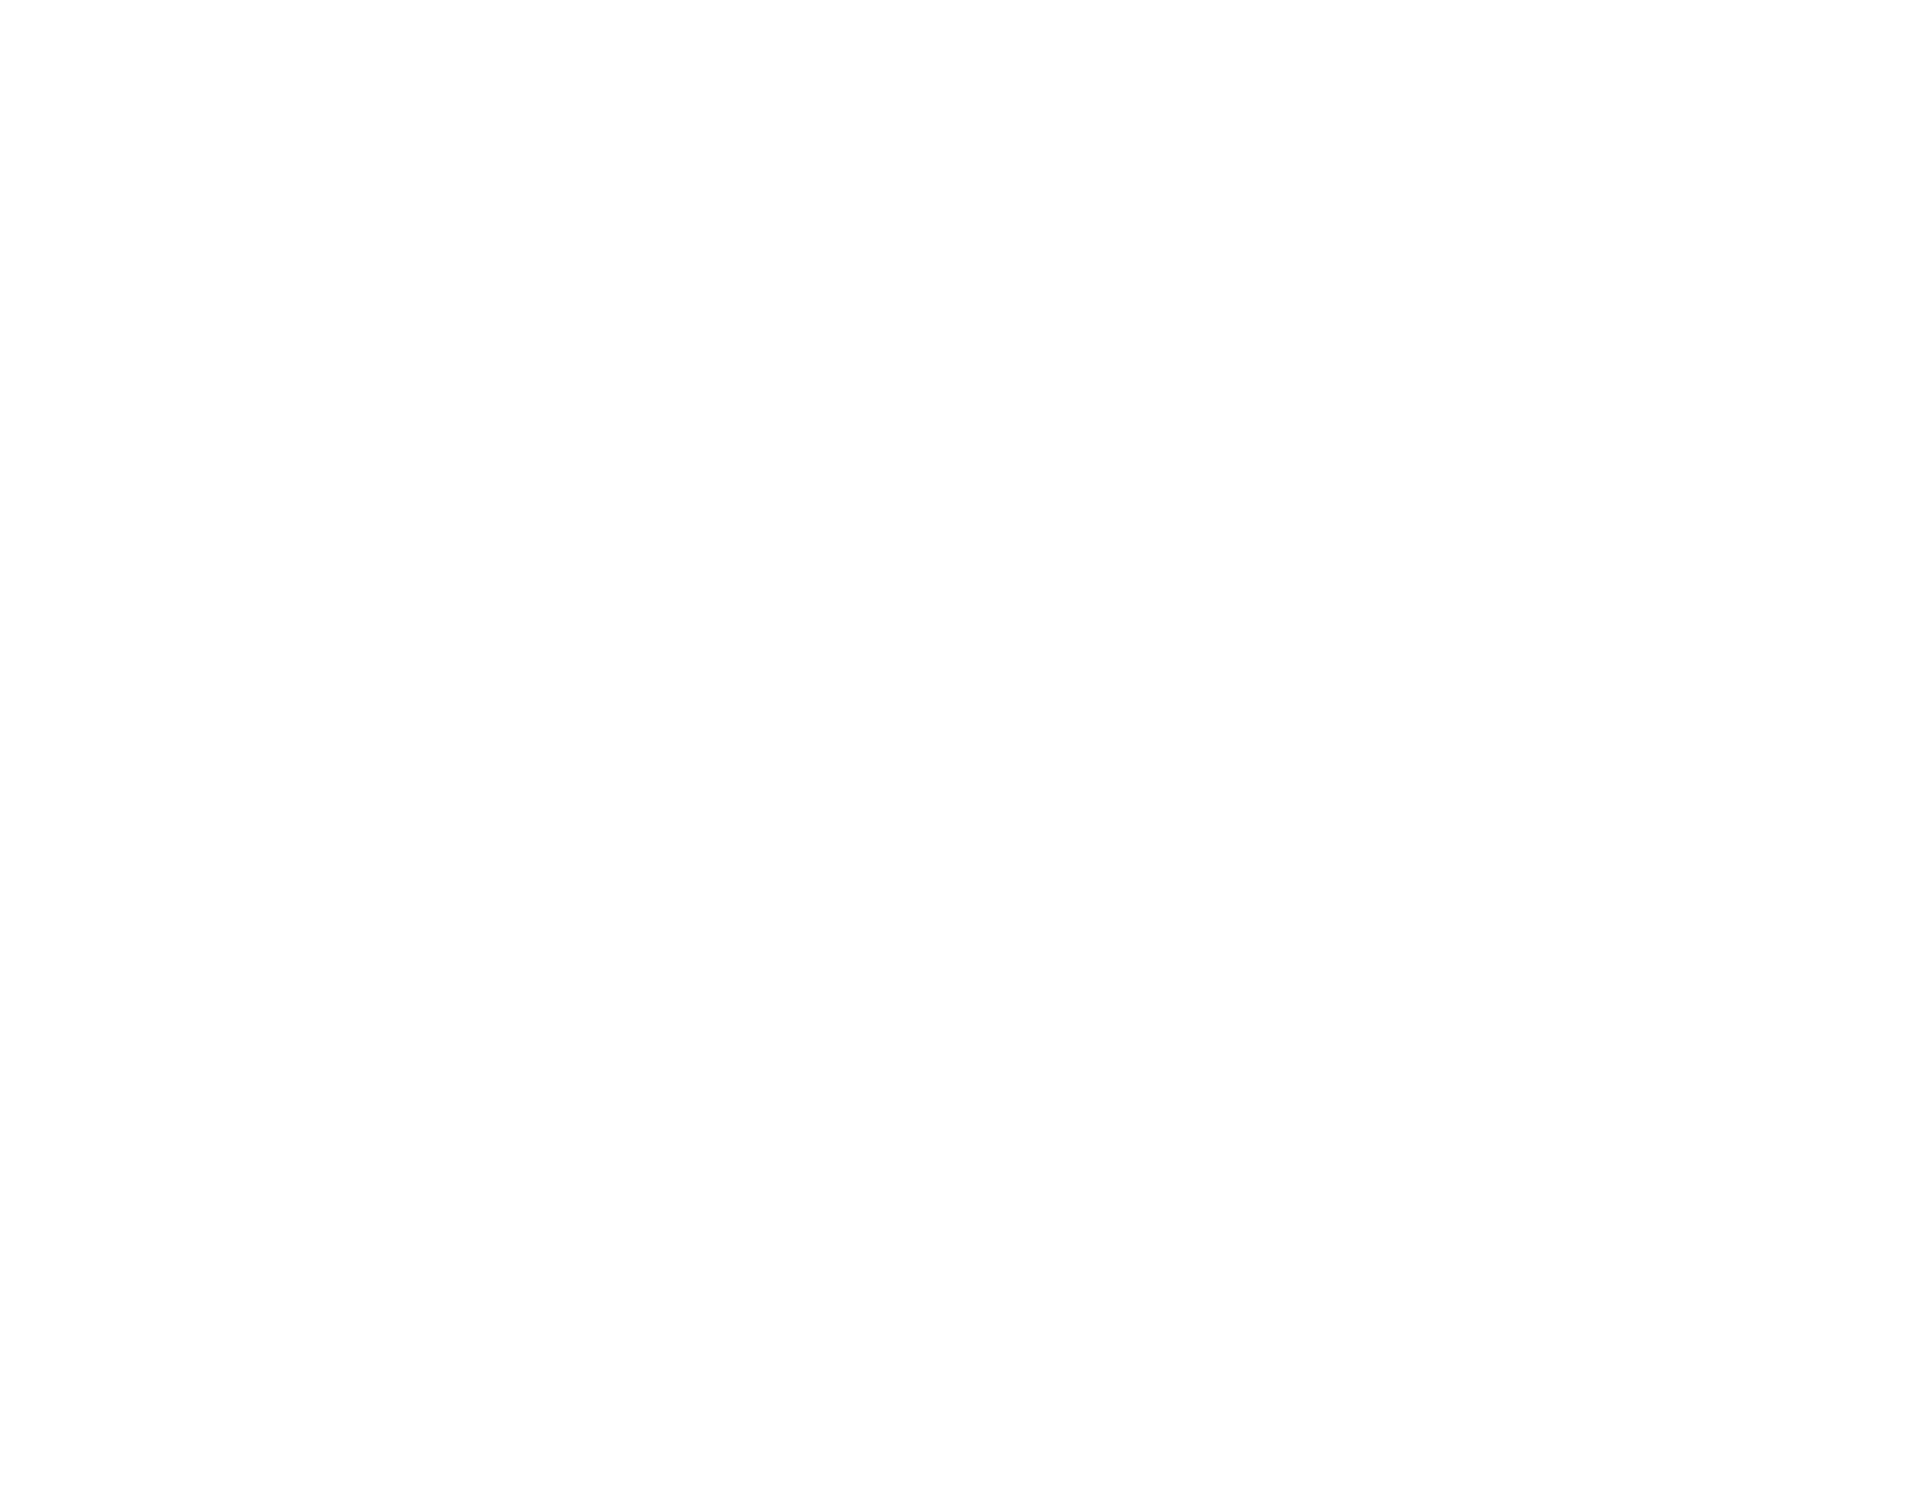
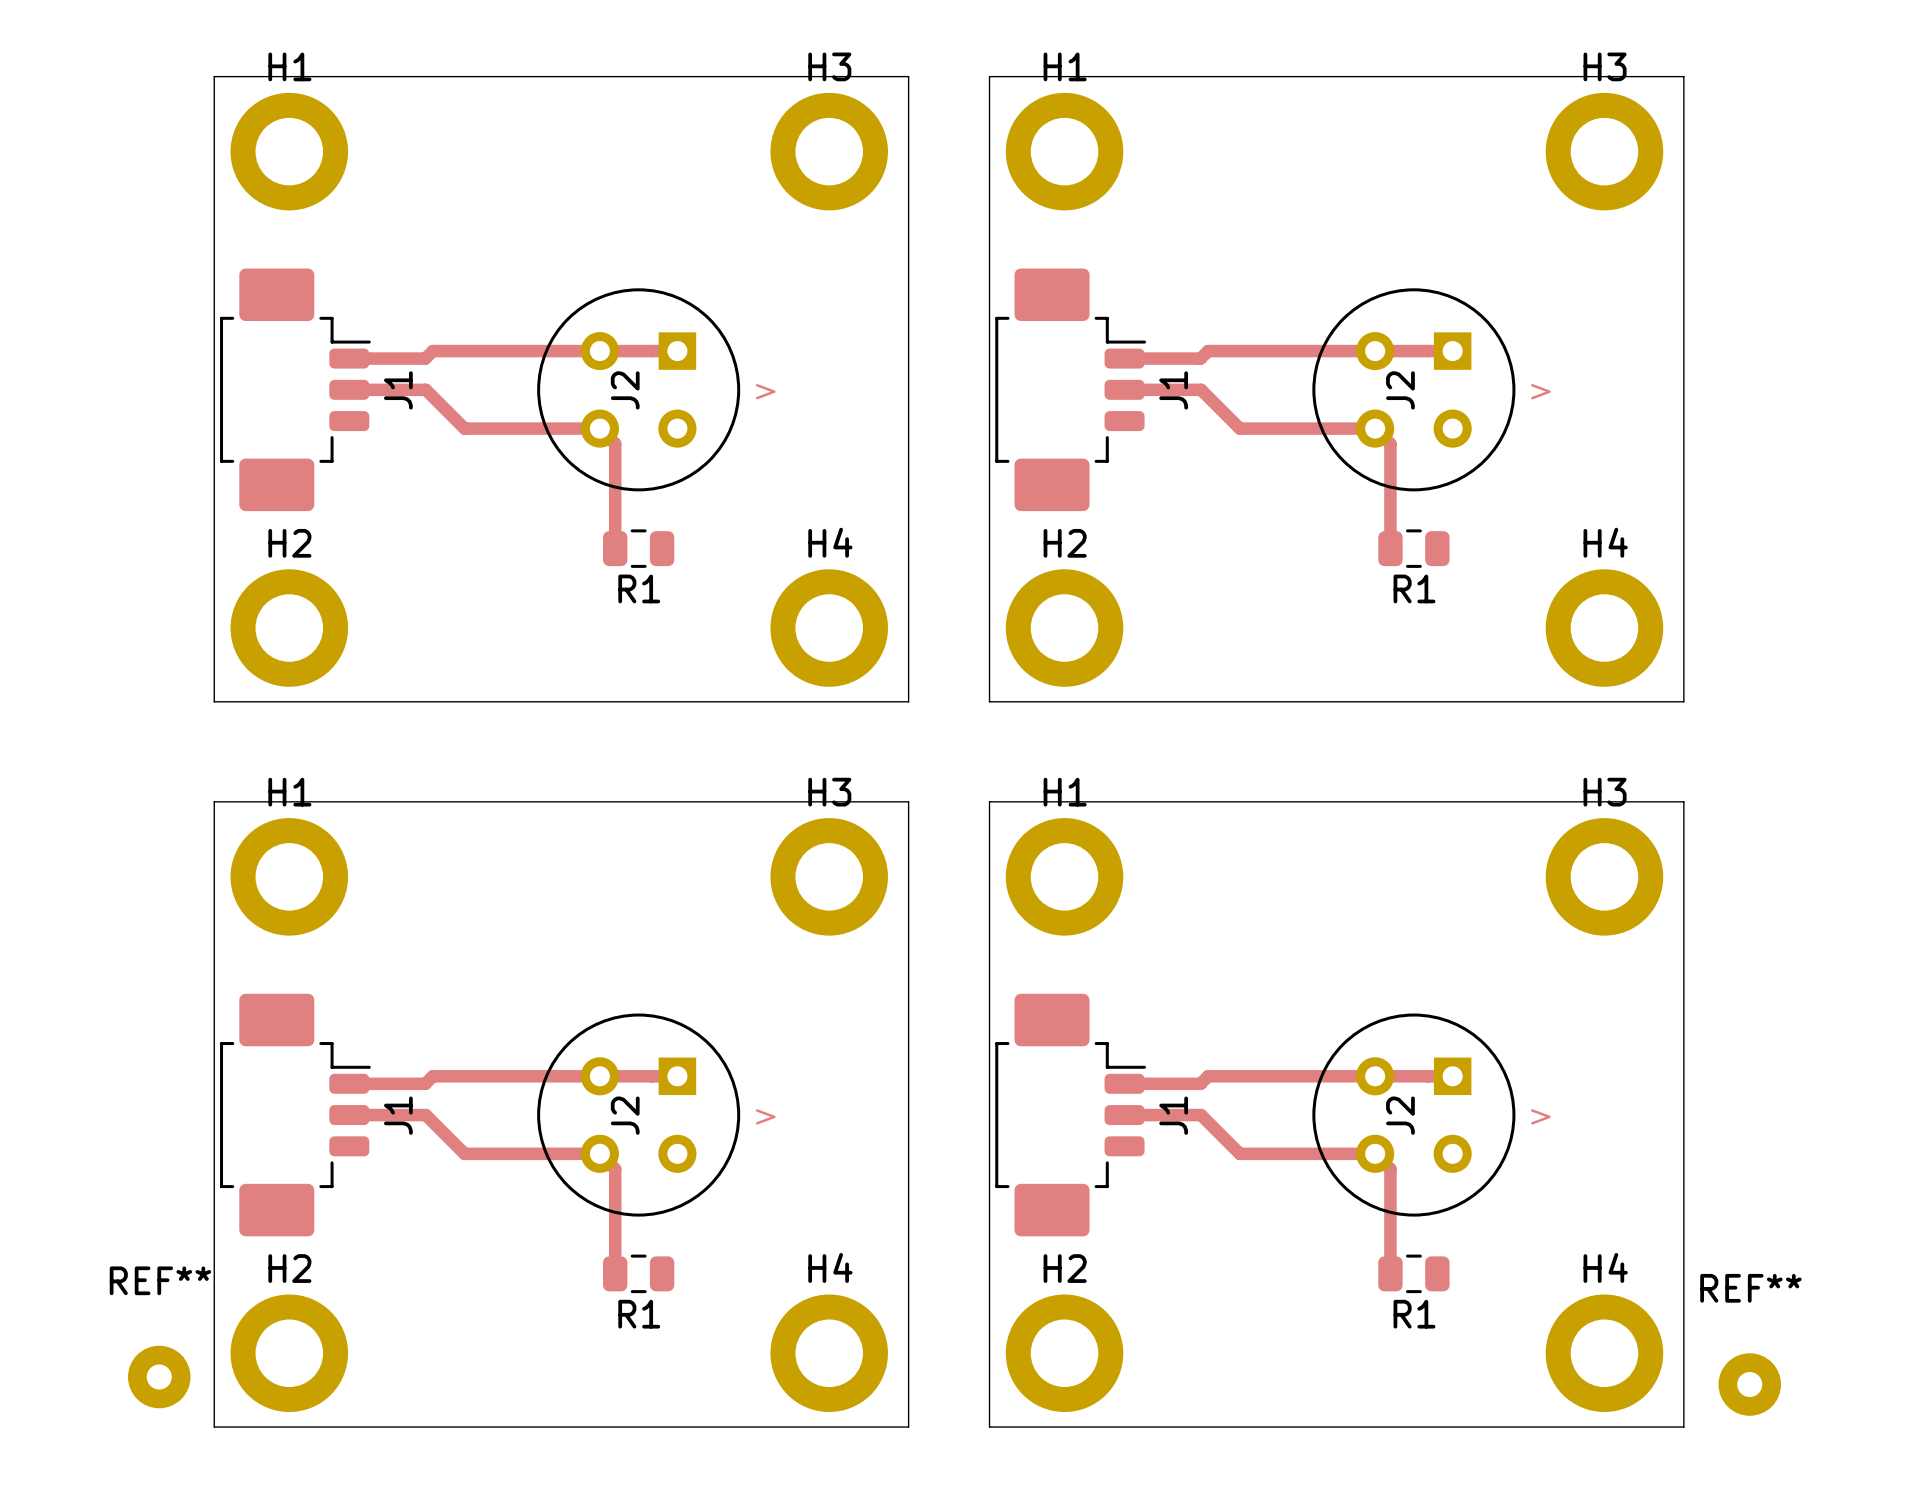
board edge: none -> (214, 76) (214, 701) (908, 701) (908, 76) (214, 76)
board edge: none -> (989, 76) (989, 701) (1683, 701) (1683, 76) (989, 76)
H1: none -> (289, 151)
H3: none -> (829, 151)
H1: none -> (1064, 151)
H3: none -> (1604, 151)
track: none -> (677, 351) (432, 351) (425, 358) (349, 358)
track: none -> (1452, 351) (1208, 351) (1200, 358) (1124, 358)
J1: none -> (295, 389)
track: none -> (349, 389) (425, 389) (464, 428) (599, 428) (615, 443) (615, 548)
J2: none -> (638, 389)
J1: none -> (1070, 389)
track: none -> (1124, 389) (1201, 389) (1239, 428) (1375, 428) (1390, 443) (1390, 548)
J2: none -> (1413, 389)
text: none -> > (765, 391)
text: none -> > (1540, 391)
R1: none -> (638, 548)
R1: none -> (1413, 548)
H2: none -> (289, 628)
H4: none -> (829, 628)
H2: none -> (1064, 628)
H4: none -> (1604, 628)
board edge: none -> (214, 801) (214, 1427) (908, 1427) (908, 801) (214, 801)
board edge: none -> (989, 801) (989, 1427) (1683, 1427) (1683, 801) (989, 801)
H1: none -> (289, 876)
H3: none -> (829, 876)
H1: none -> (1064, 876)
H3: none -> (1604, 876)
track: none -> (677, 1076) (432, 1076) (425, 1083) (349, 1083)
track: none -> (1452, 1076) (1208, 1076) (1200, 1083) (1124, 1083)
J1: none -> (295, 1115)
track: none -> (349, 1115) (425, 1115) (464, 1153) (599, 1153) (615, 1169) (615, 1273)
J2: none -> (638, 1115)
J1: none -> (1070, 1115)
track: none -> (1124, 1115) (1201, 1115) (1239, 1153) (1375, 1153) (1390, 1169) (1390, 1273)
J2: none -> (1413, 1115)
text: none -> > (765, 1116)
text: none -> > (1540, 1116)
R1: none -> (638, 1273)
R1: none -> (1413, 1273)
H2: none -> (289, 1353)
H4: none -> (829, 1353)
H2: none -> (1064, 1353)
H4: none -> (1604, 1353)
REF**: none -> (159, 1377)
REF**: none -> (1749, 1384)

